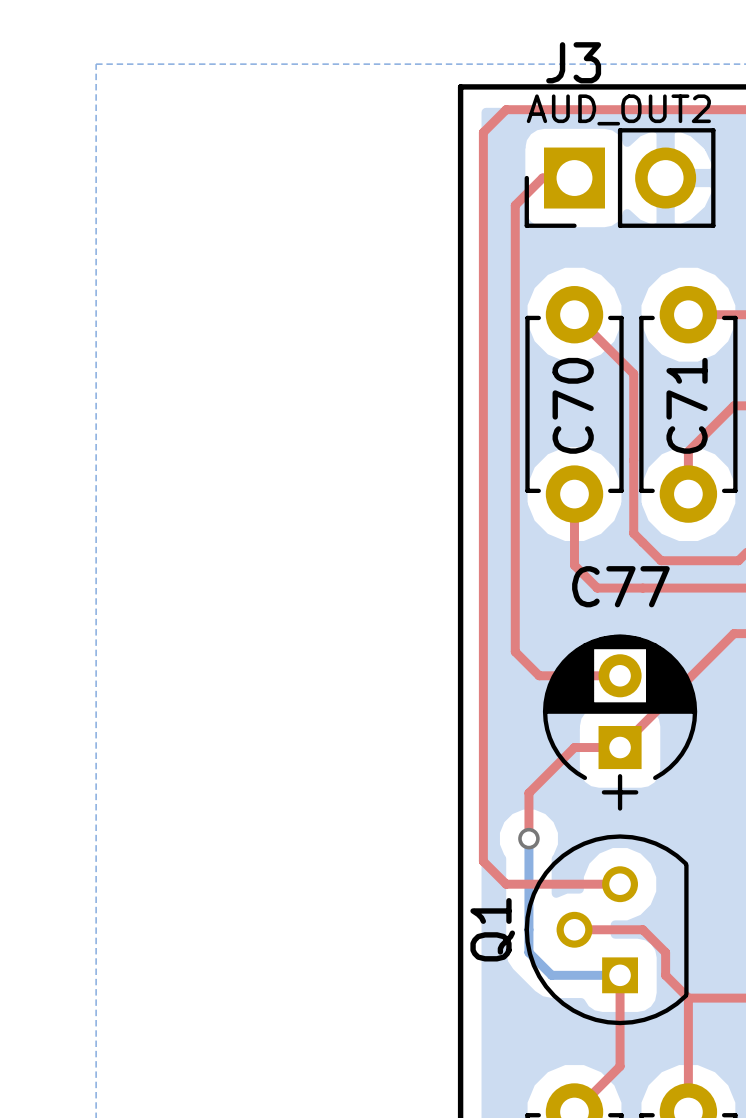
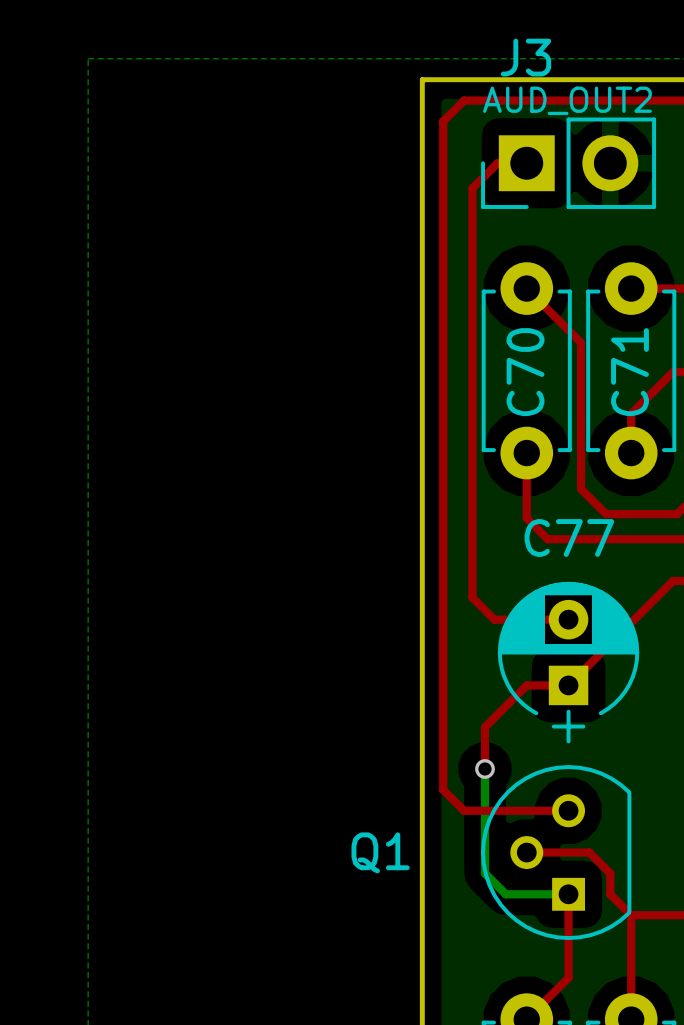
Q1 name rotation: 0° (492, 929) -> 90° clockwise (380, 852)

